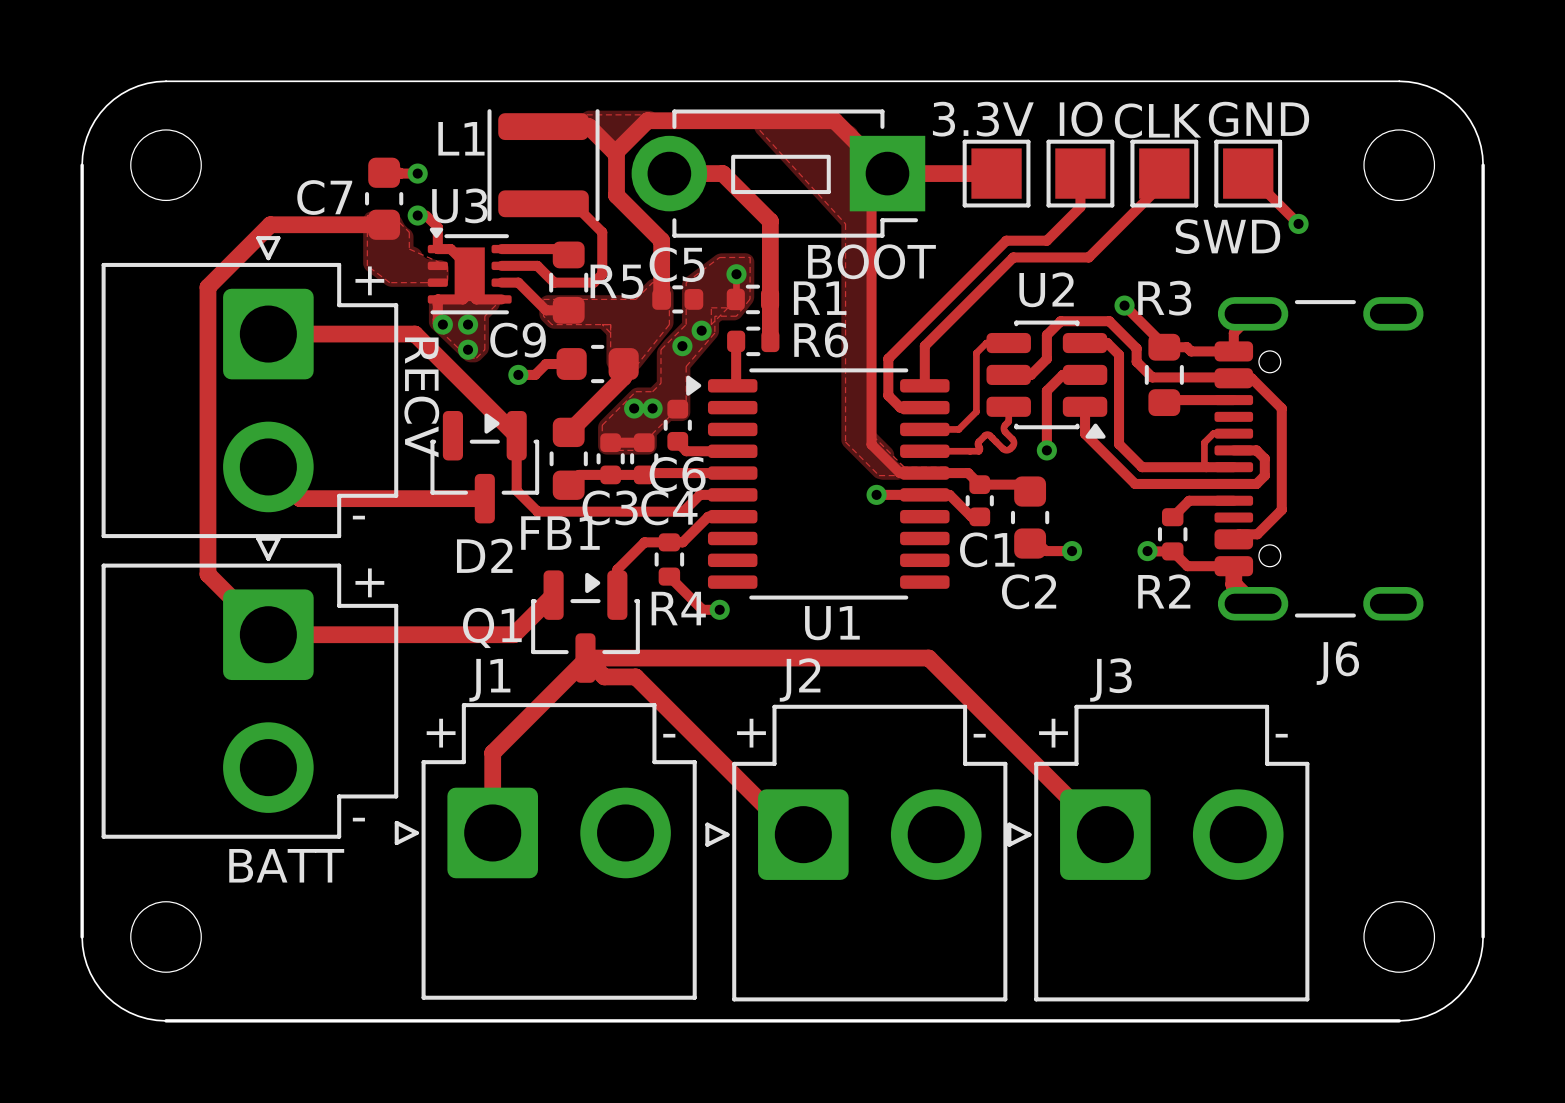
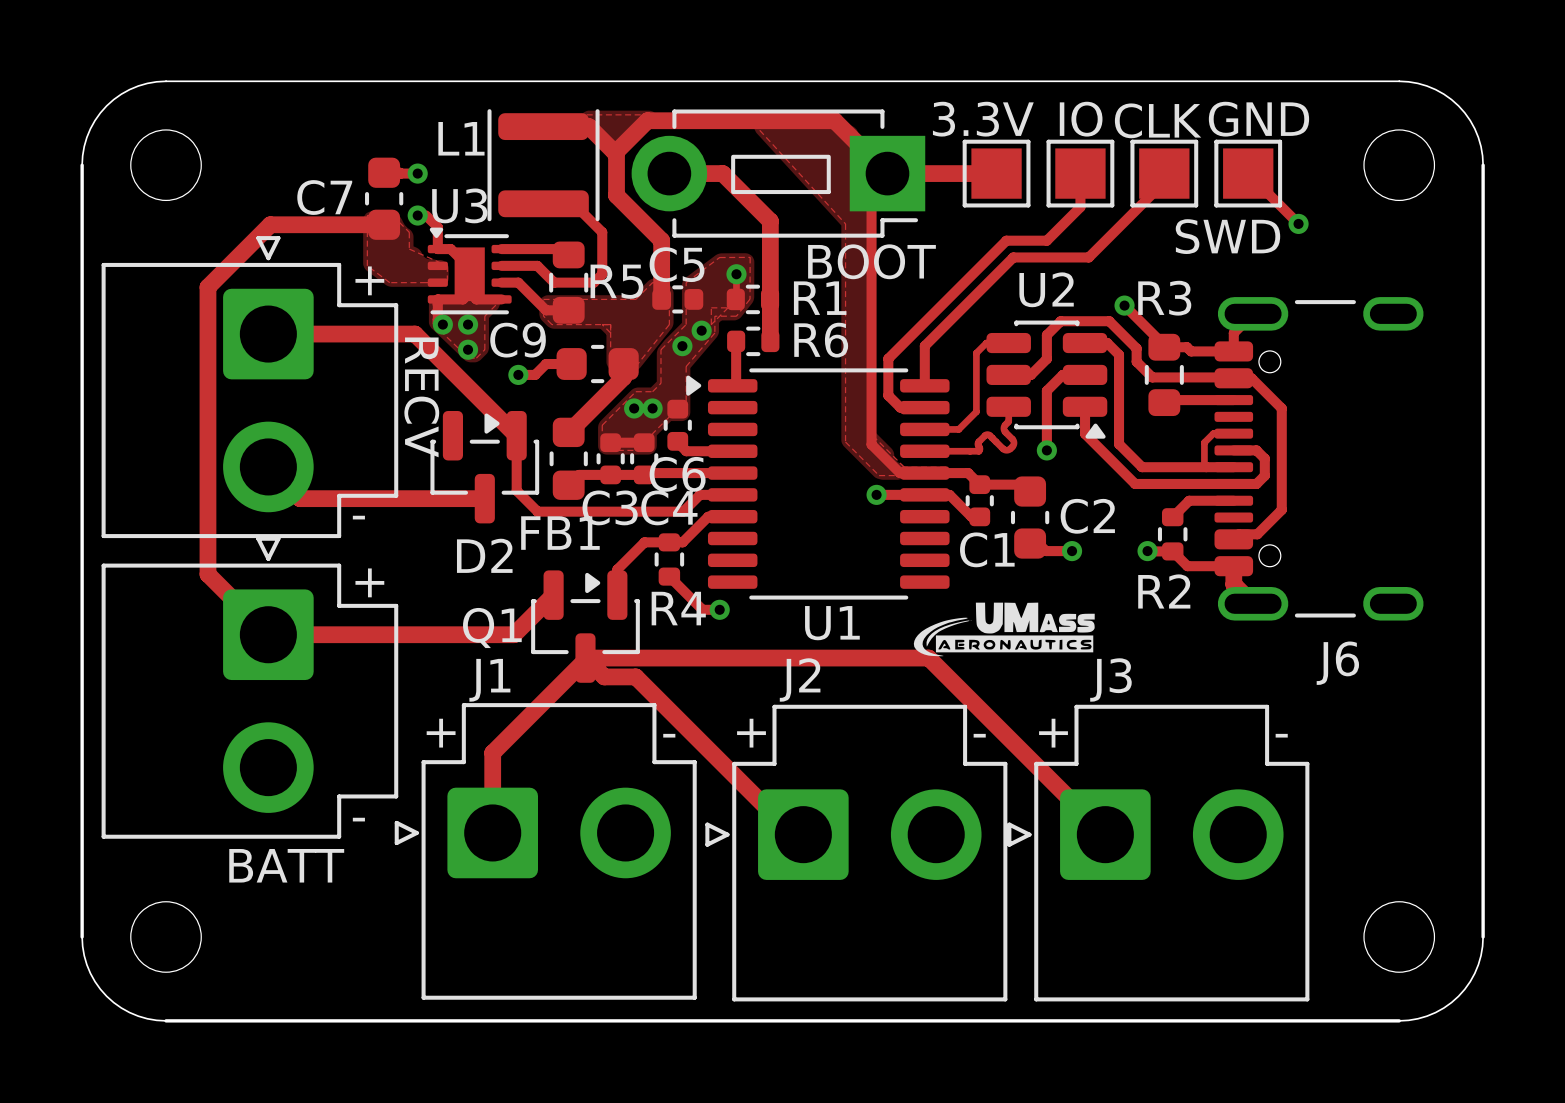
C2 name position: C2 (1029, 591) -> C2 (1087, 516)
drawing: none -> [913, 602, 1095, 657]

